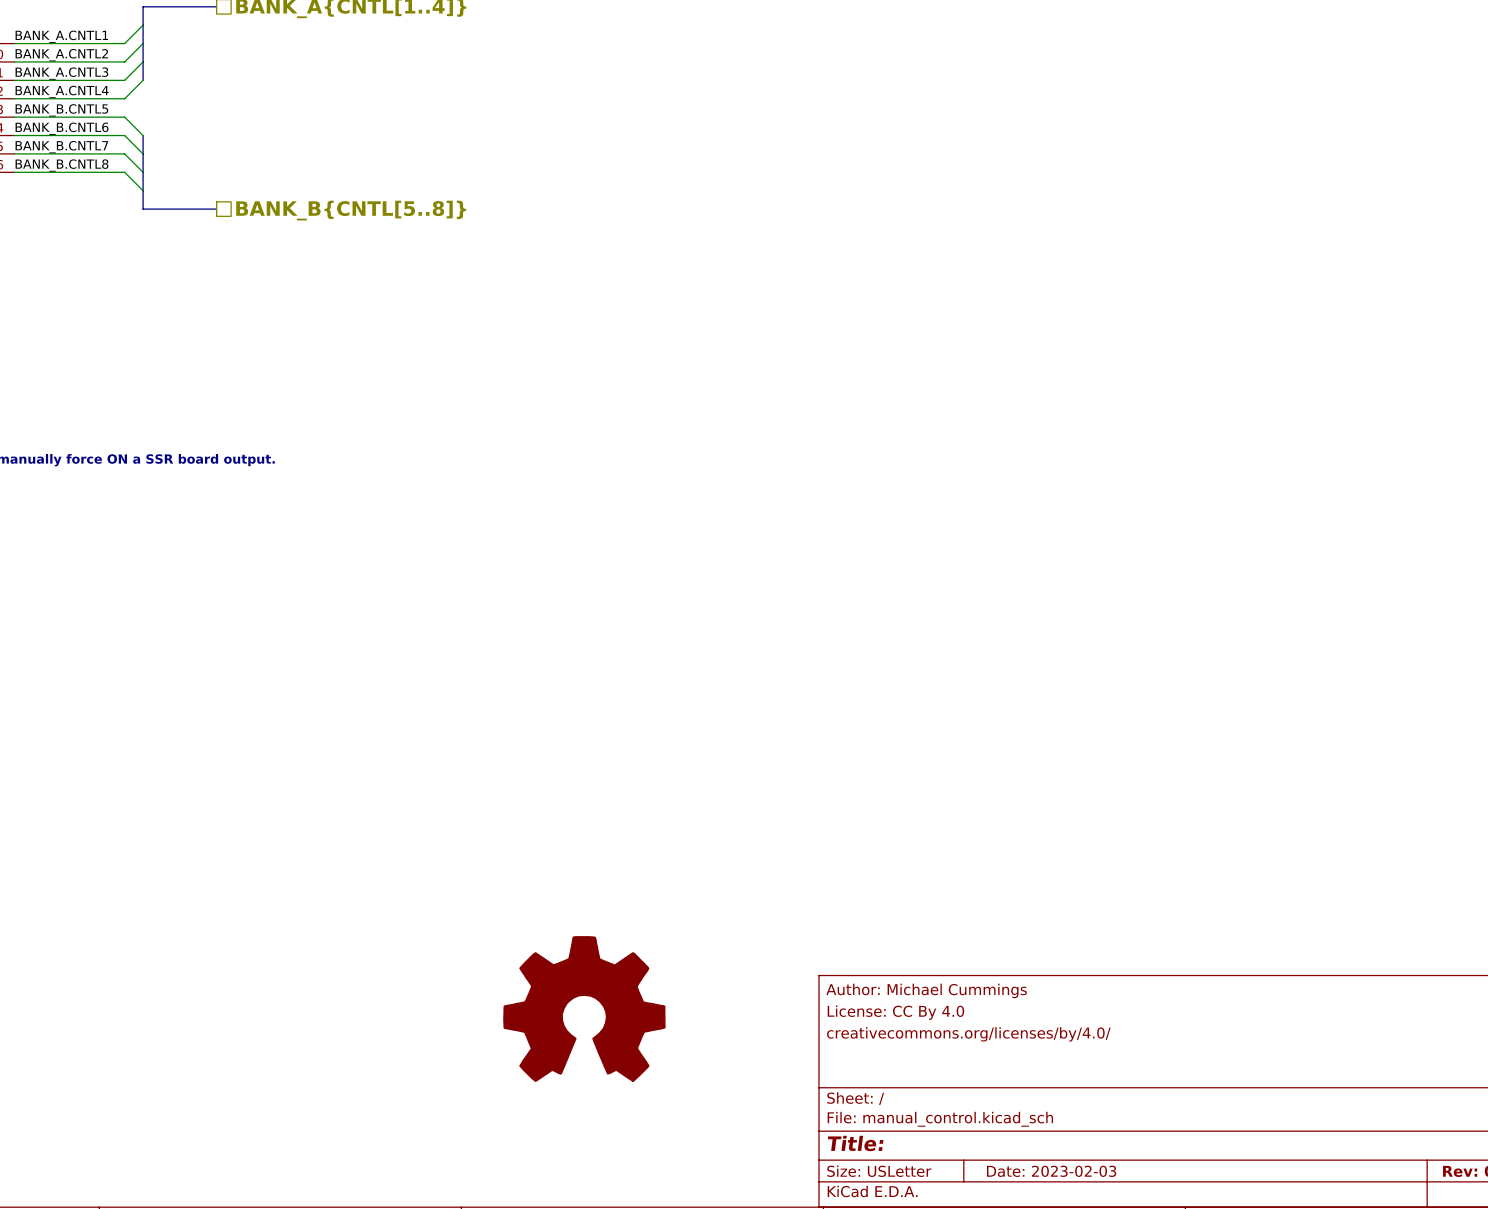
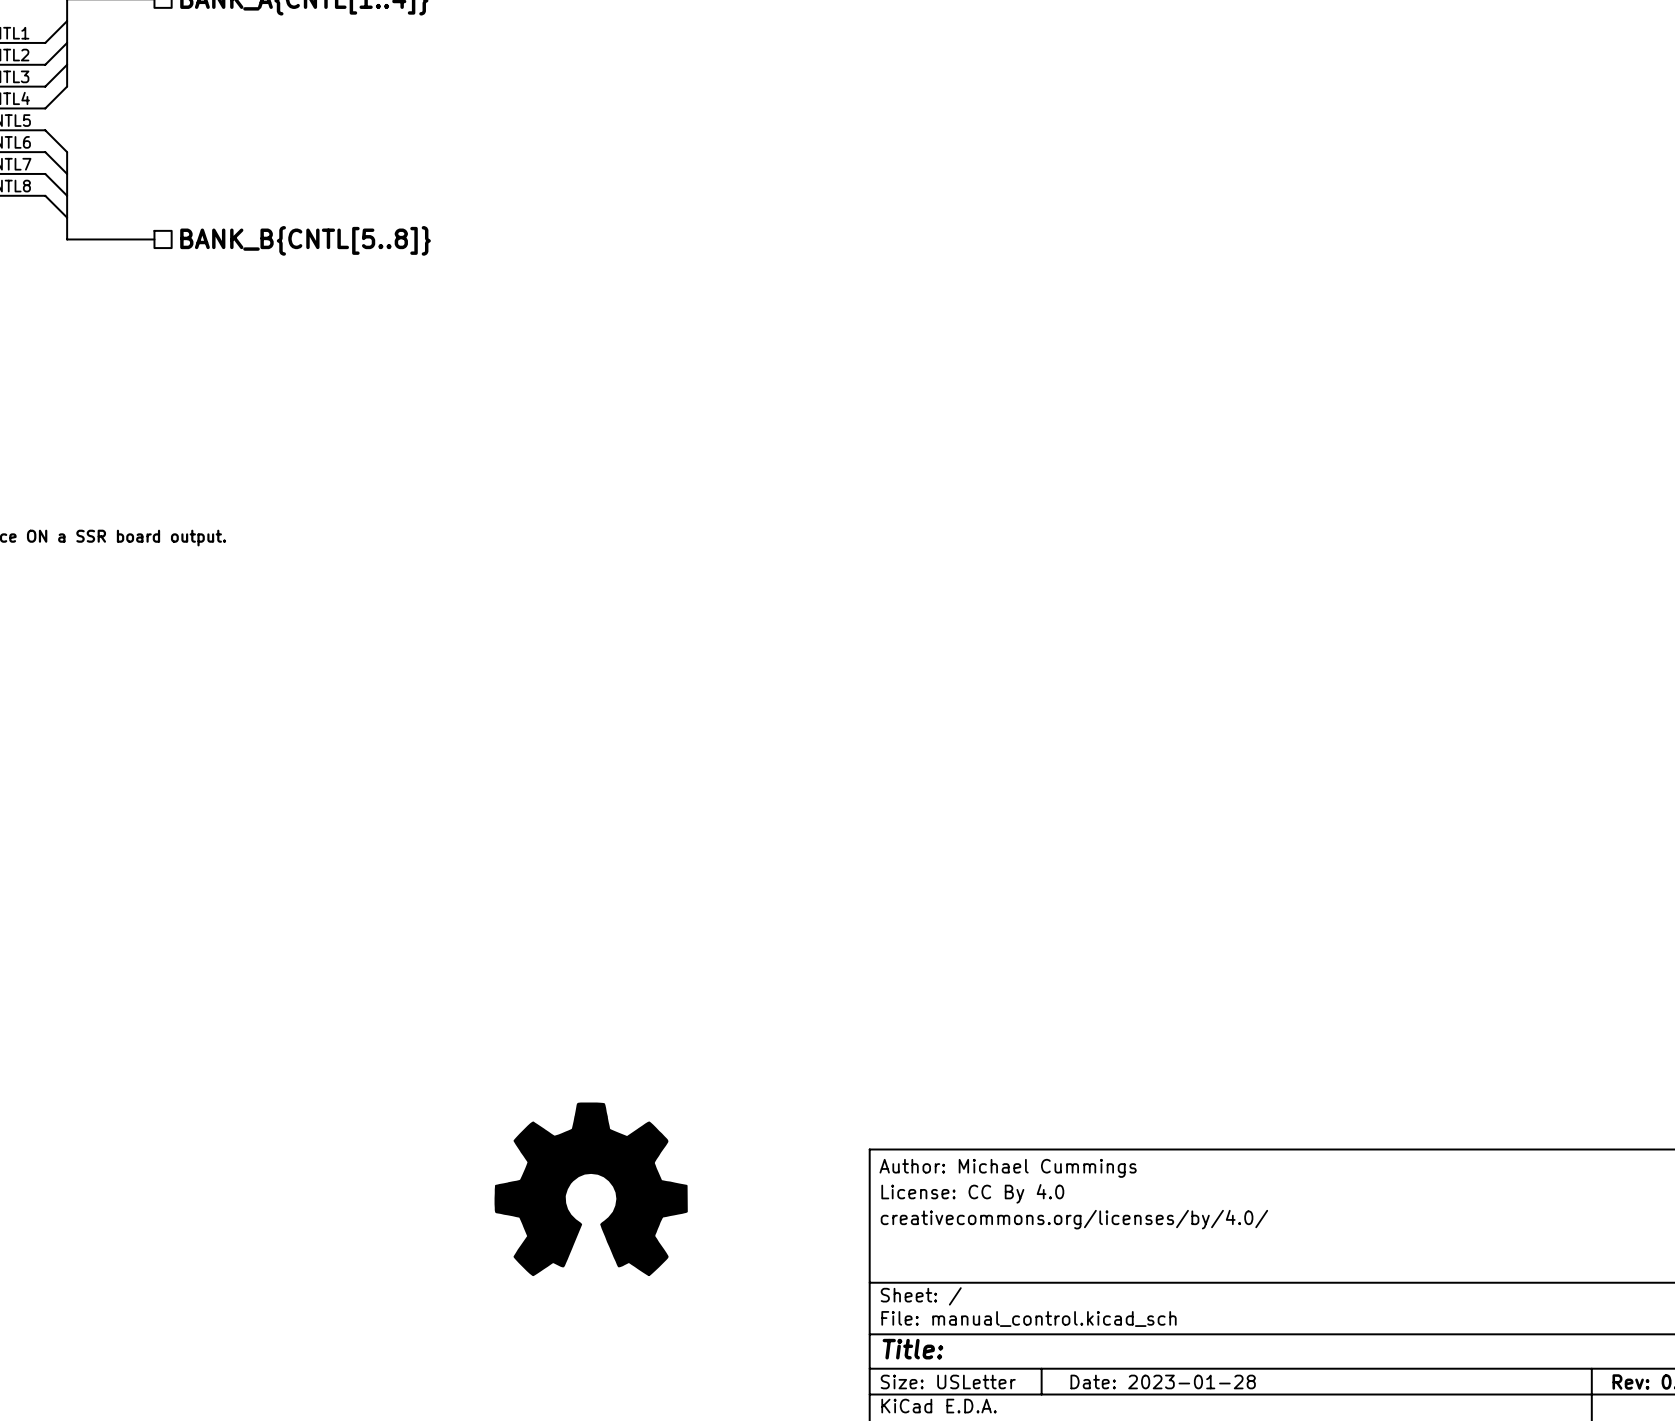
title block: Date: 2023-02-03 (1051, 1171) -> Date: 2023-01-28 (1163, 1381)

